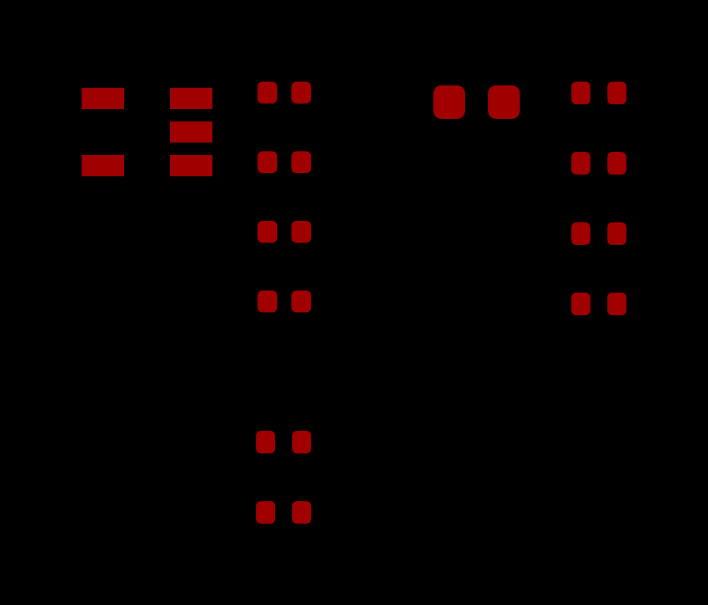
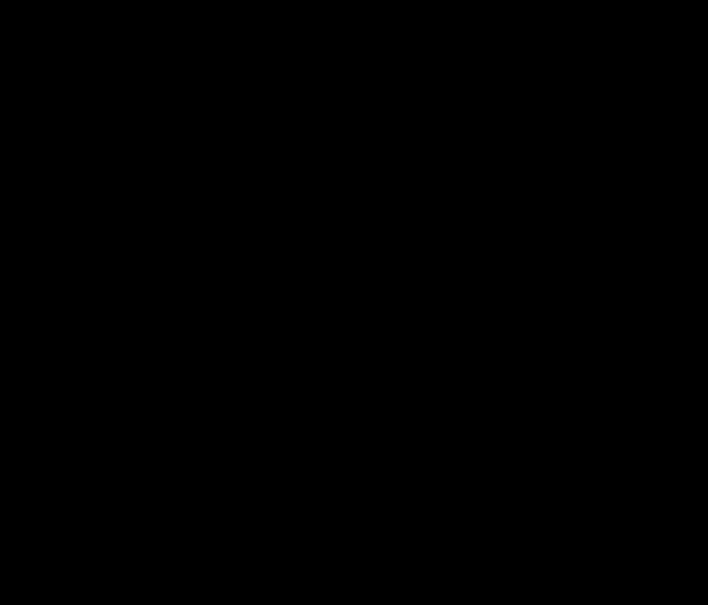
part: (284, 92) -> none
part: (598, 92) -> none
part: (476, 102) -> none
part: (147, 132) -> none
part: (284, 162) -> none
part: (598, 163) -> none
part: (284, 231) -> none
part: (598, 233) -> none
part: (284, 301) -> none
part: (598, 303) -> none
part: (283, 442) -> none
part: (283, 512) -> none

